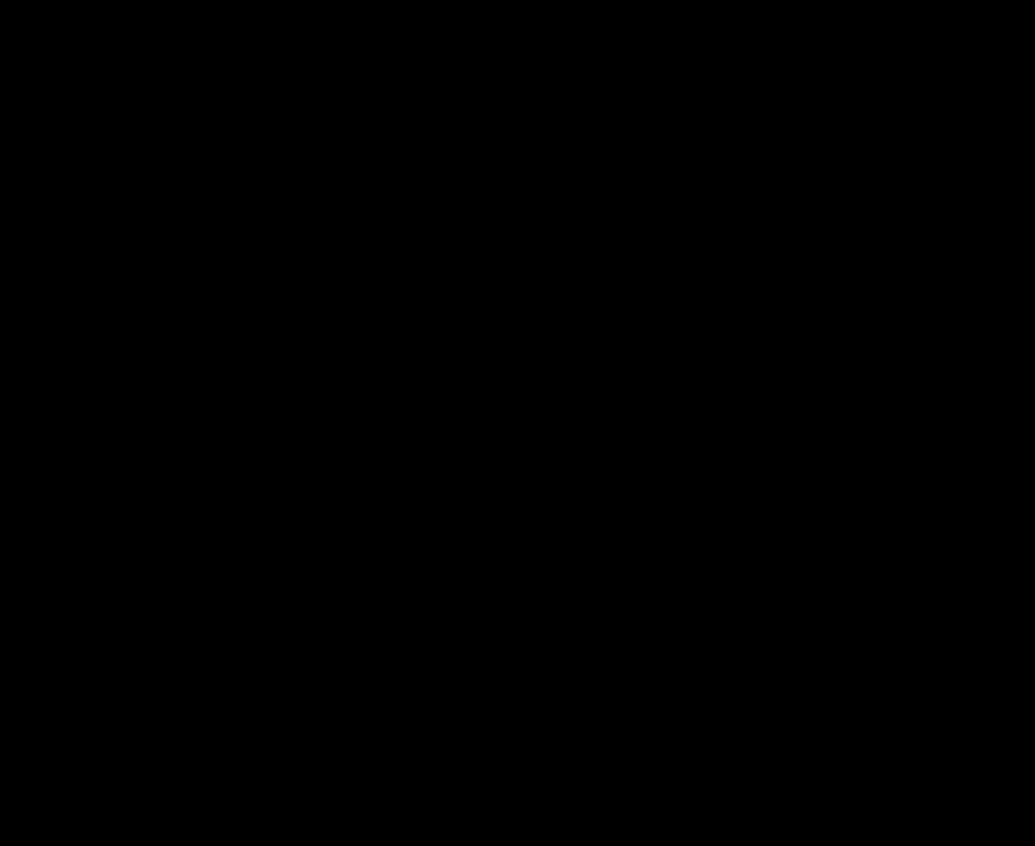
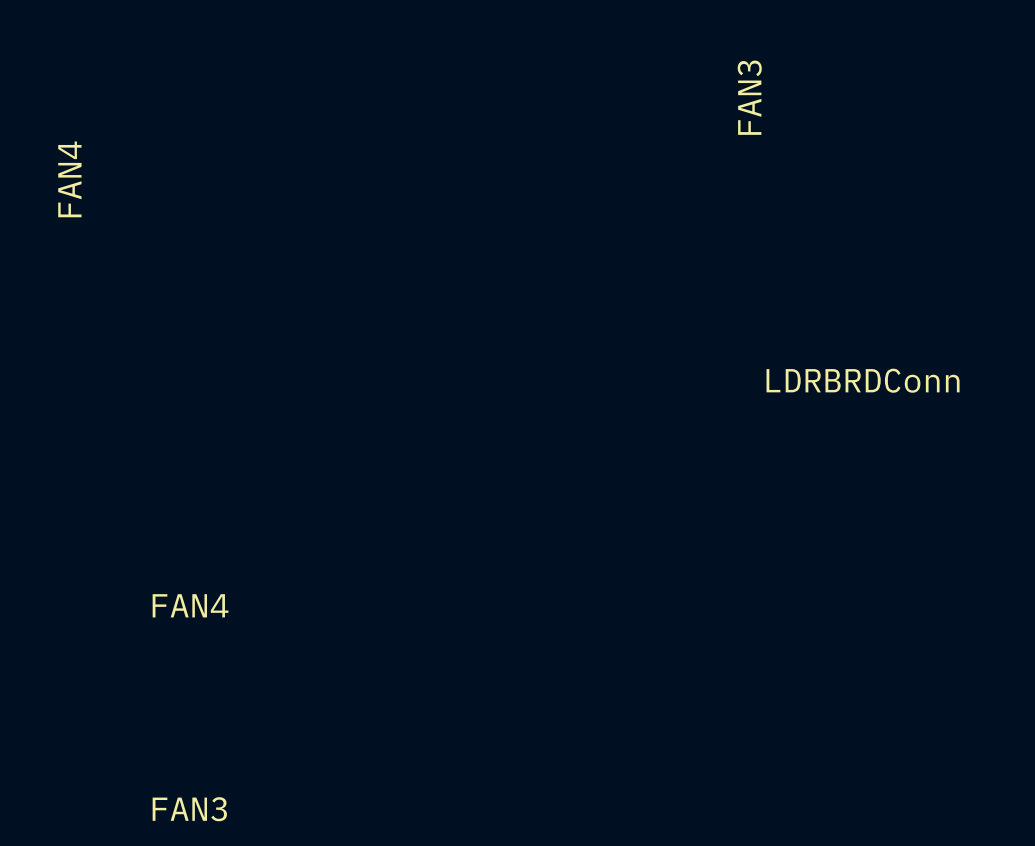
text: none -> FAN3 (749, 97)
text: none -> FAN4 (69, 179)
text: none -> LDRBRDConn (863, 380)
text: none -> FAN4 (190, 605)
text: none -> FAN3 (189, 809)

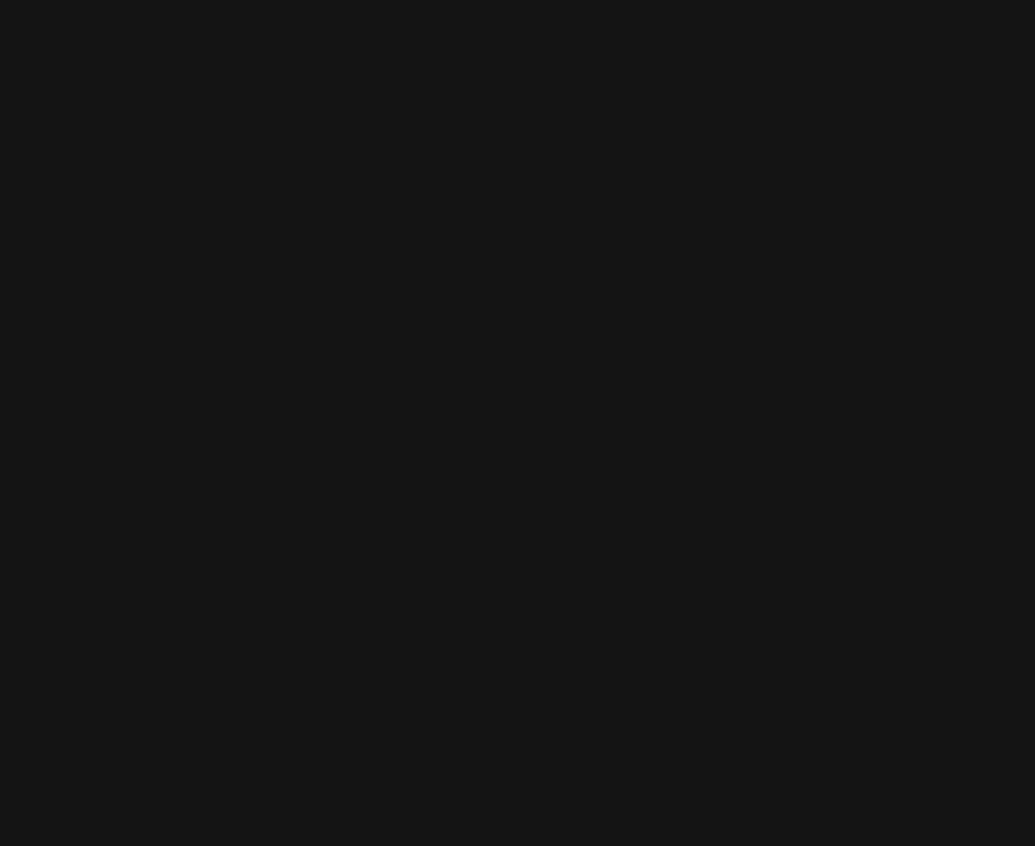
text: FAN3 (749, 97) -> none
text: FAN4 (69, 179) -> none
text: LDRBRDConn (863, 380) -> none
text: FAN4 (190, 605) -> none
text: FAN3 (189, 809) -> none

